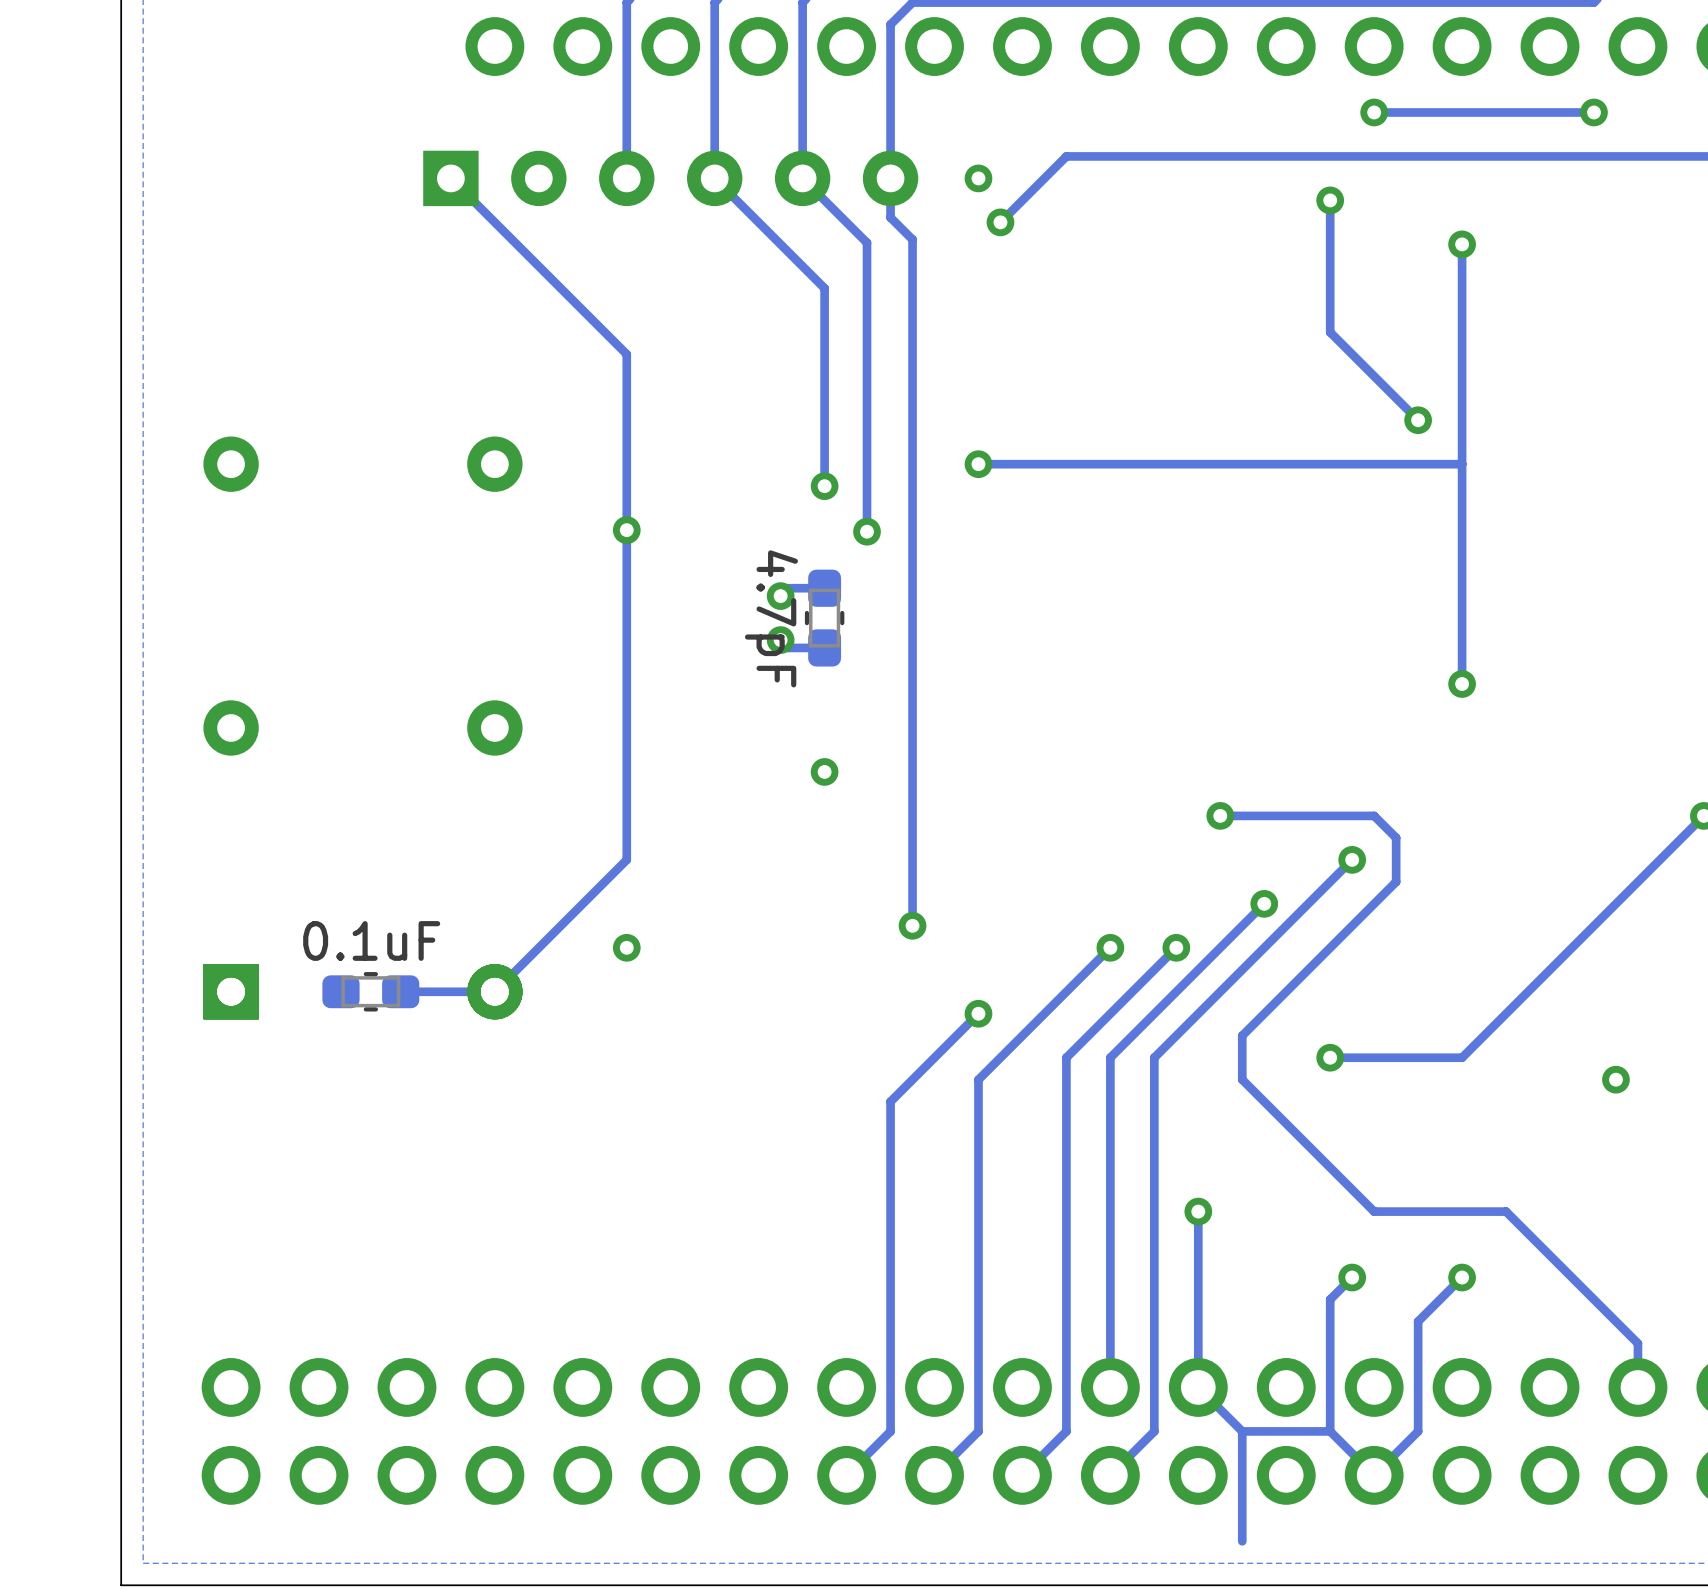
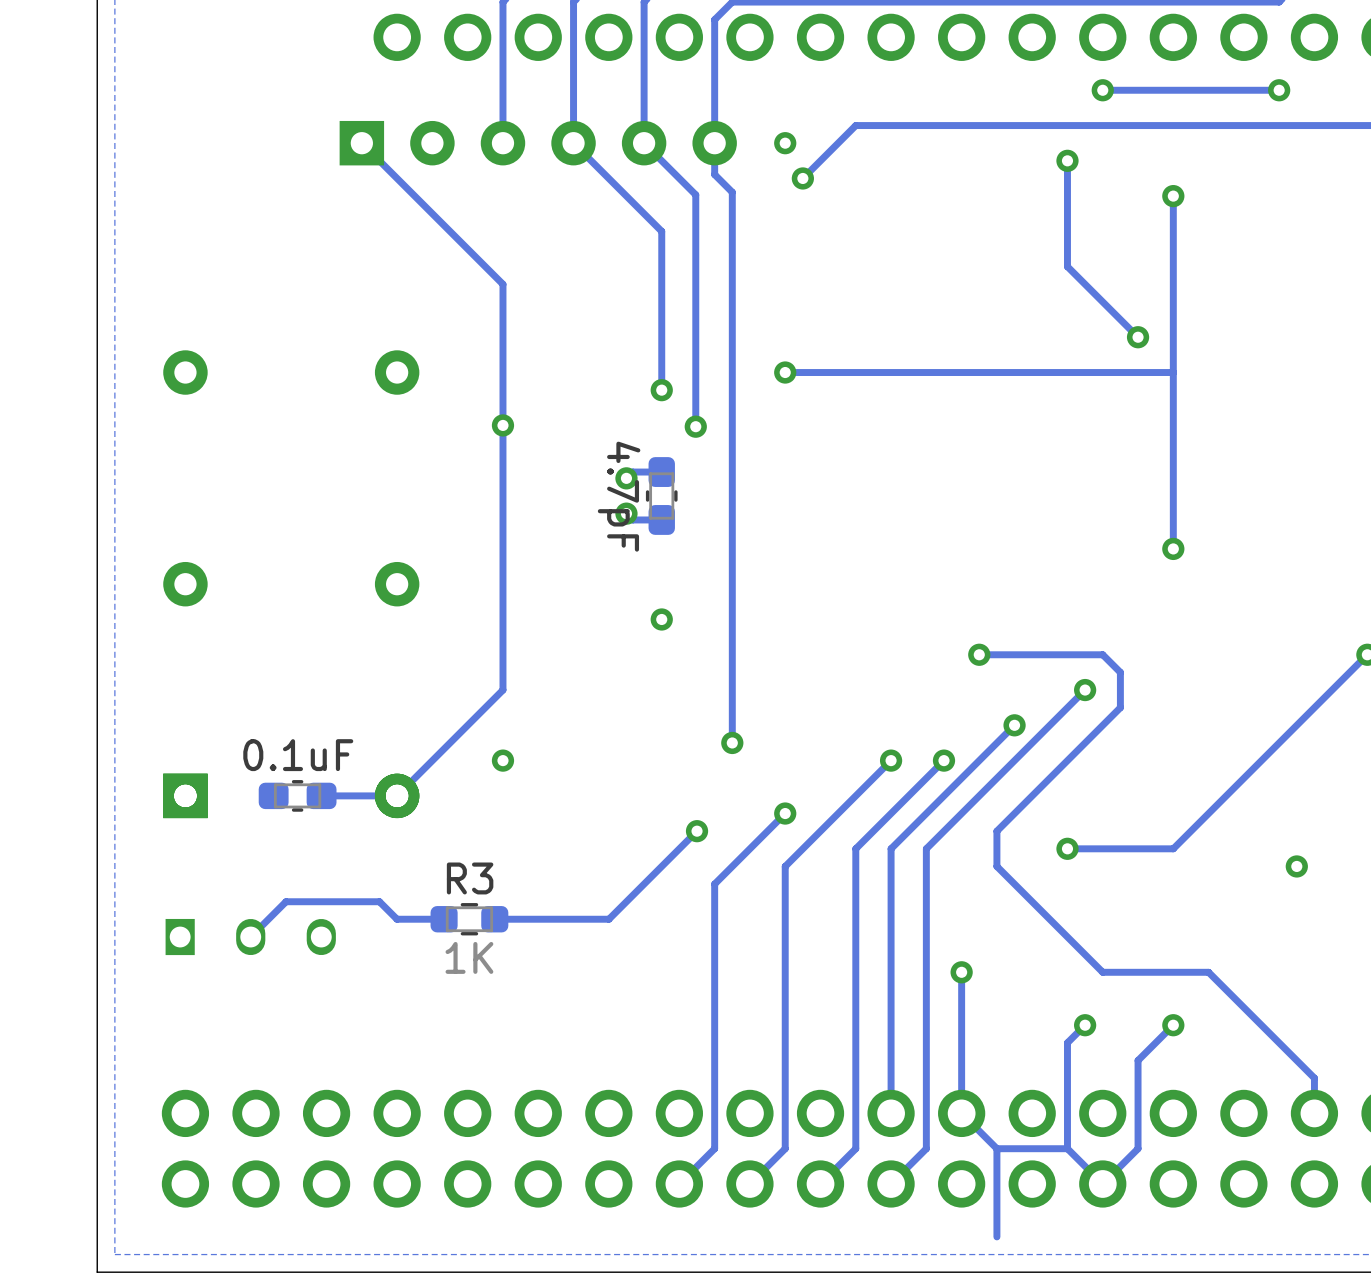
track: none -> (697, 831) (608, 919) (494, 919)
via: none -> (697, 831)
track: none -> (444, 919) (396, 919) (379, 901) (286, 901) (250, 937)
R3: none -> 1K (469, 919)
part: none -> (250, 937)

